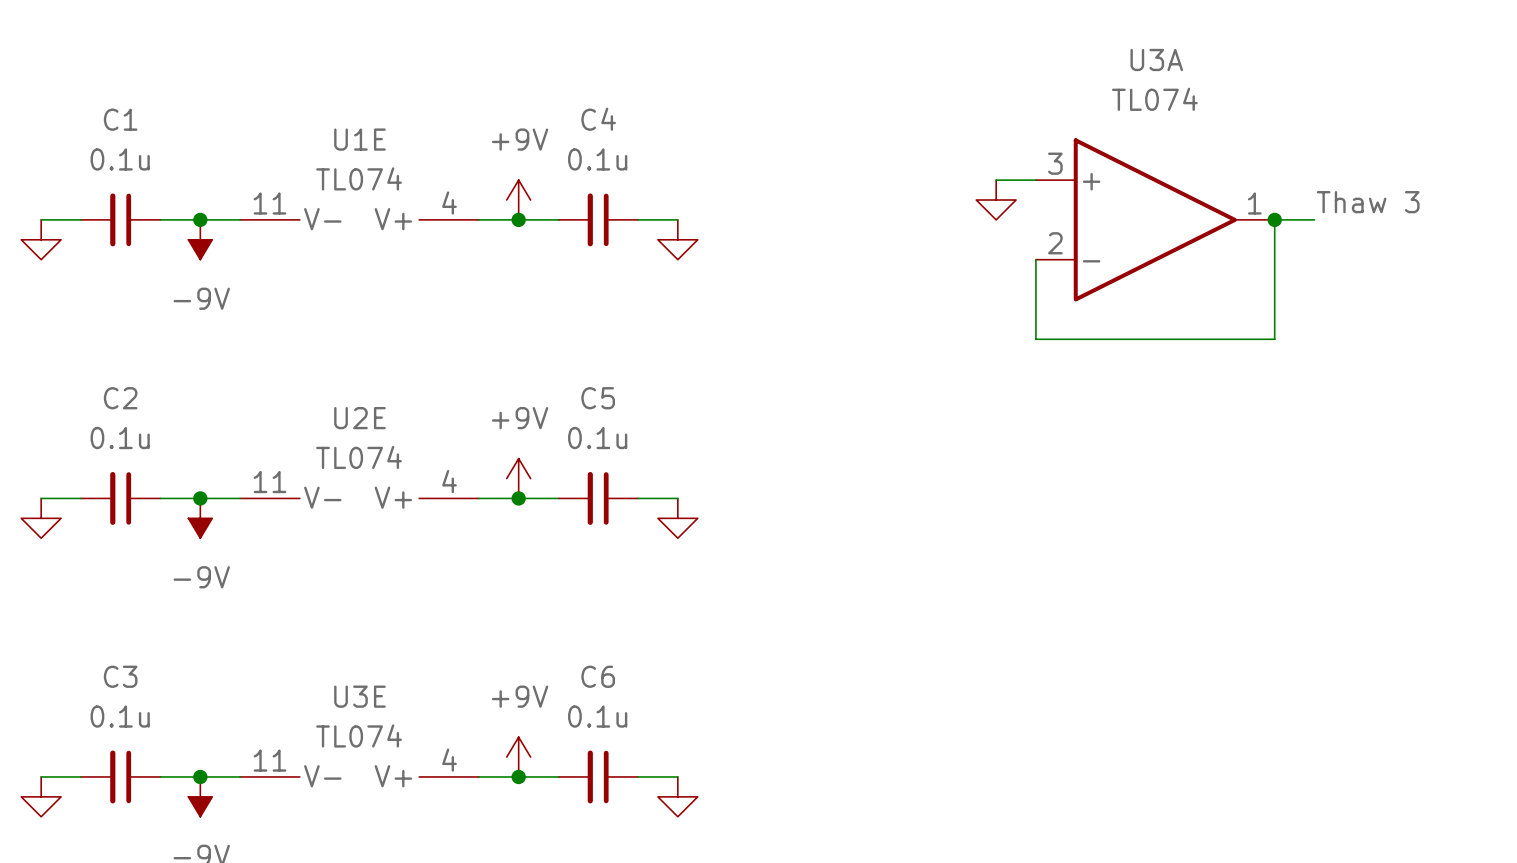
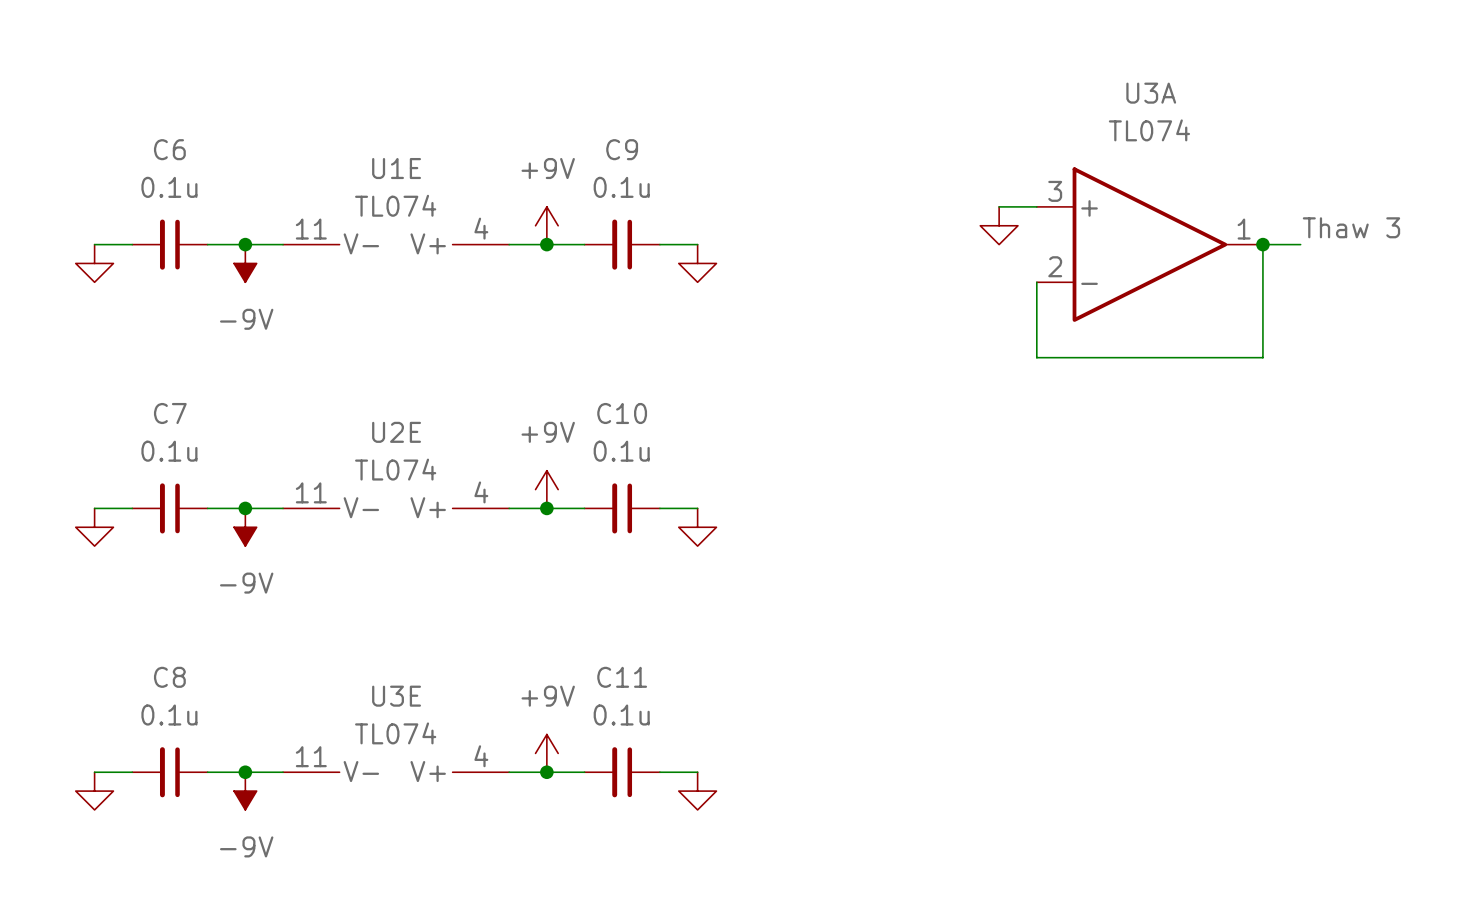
C1 name: C1 (120, 119) -> C6 (169, 149)
C4 name: C4 (598, 119) -> C9 (622, 149)
C2 name: C2 (120, 398) -> C7 (170, 413)
C5 name: C5 (598, 398) -> C10 (622, 413)
C3 name: C3 (120, 676) -> C8 (169, 677)
C6 name: C6 (598, 676) -> C11 (622, 677)

